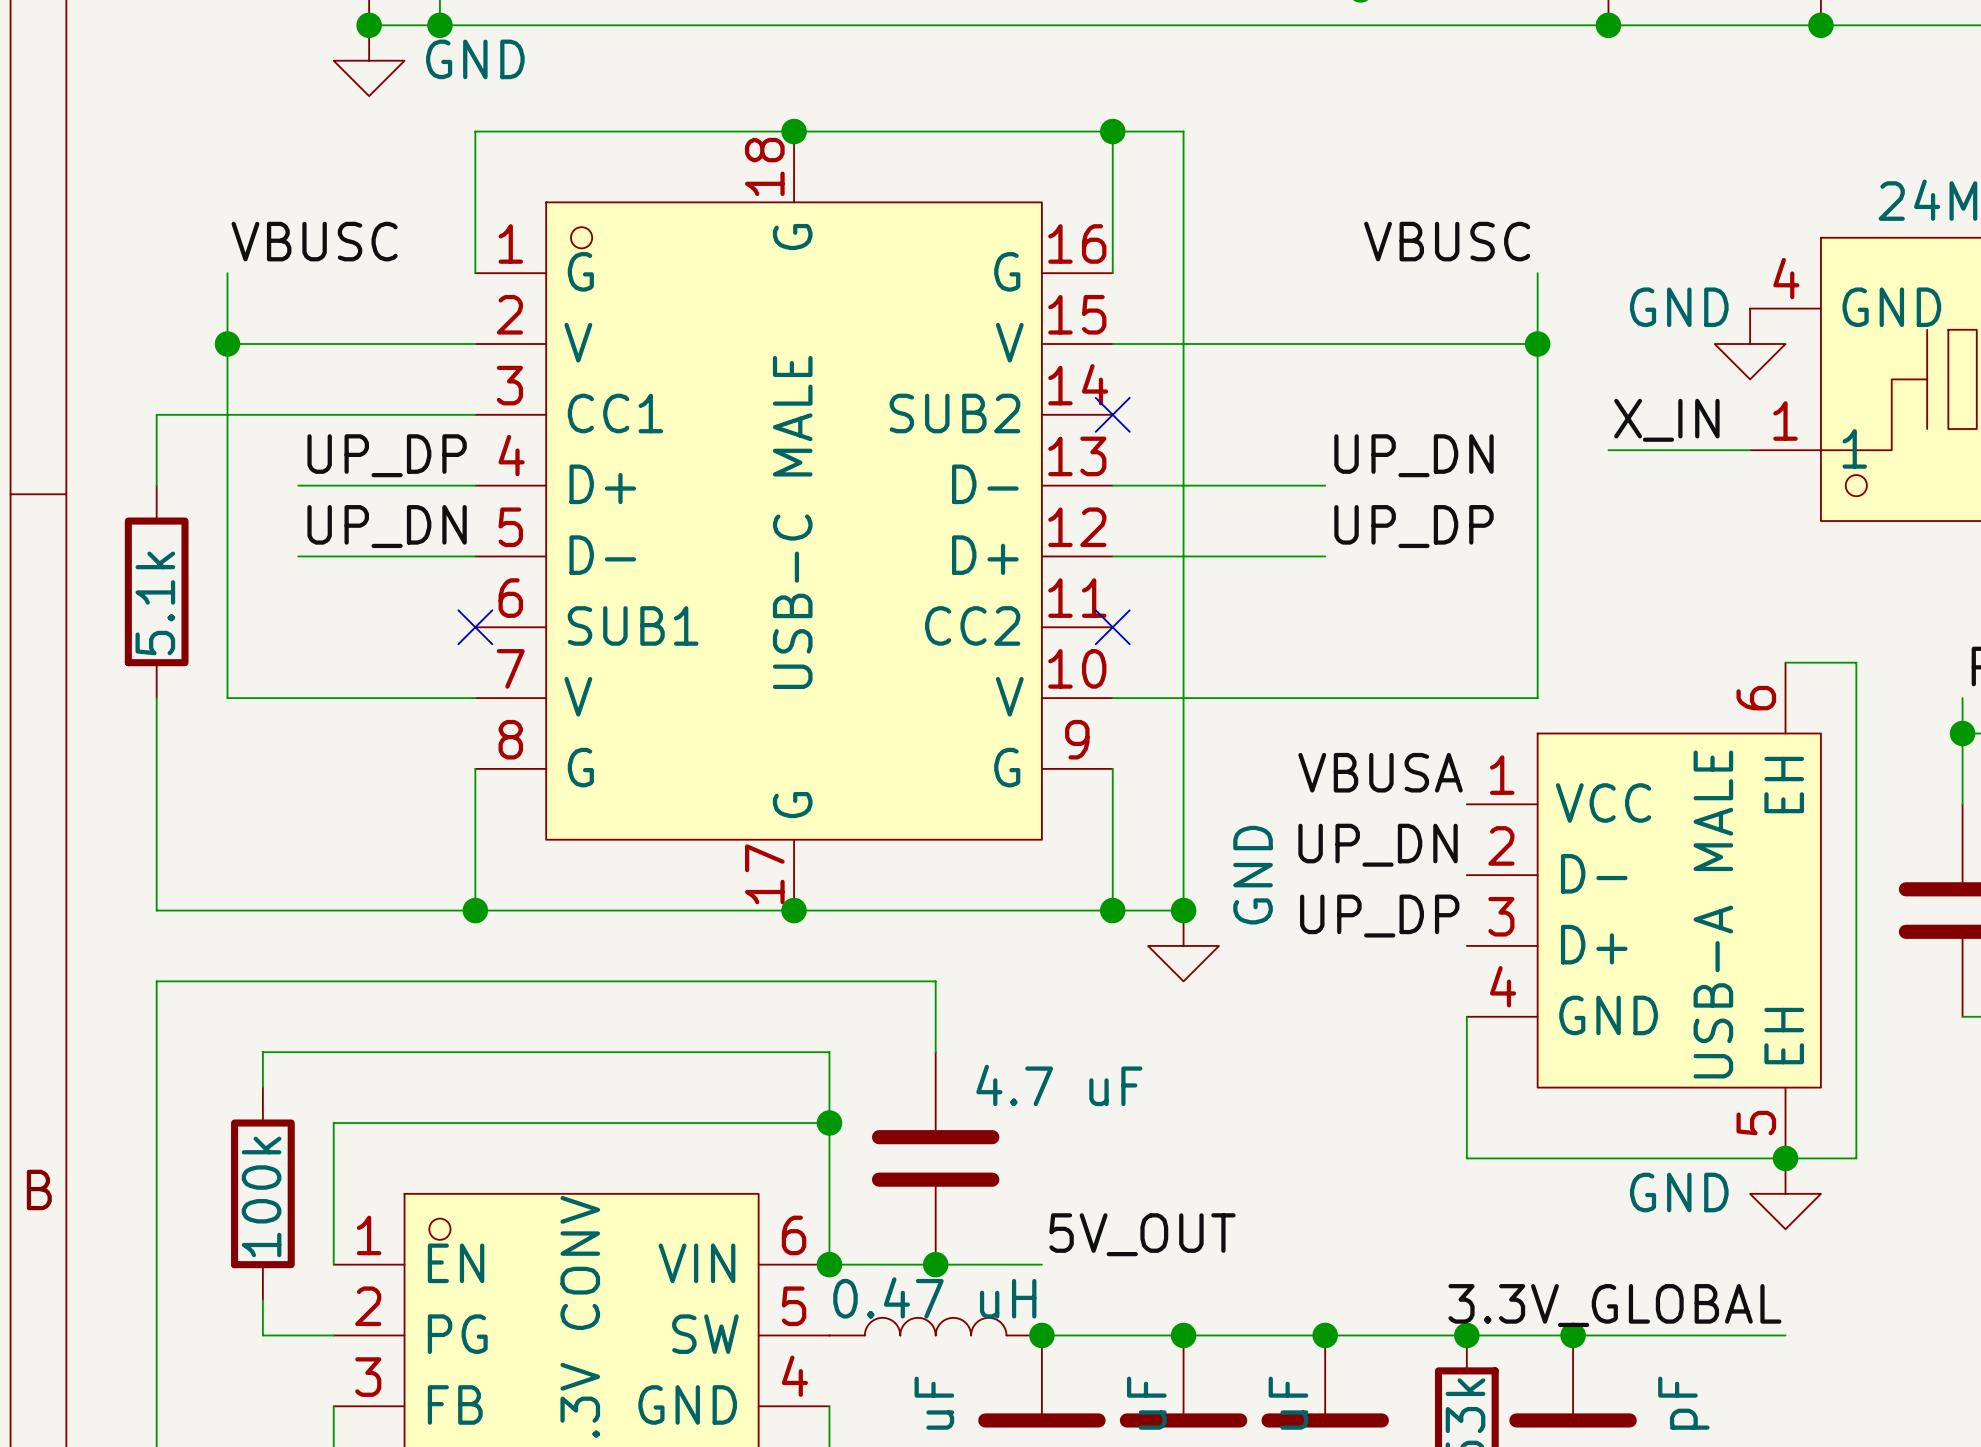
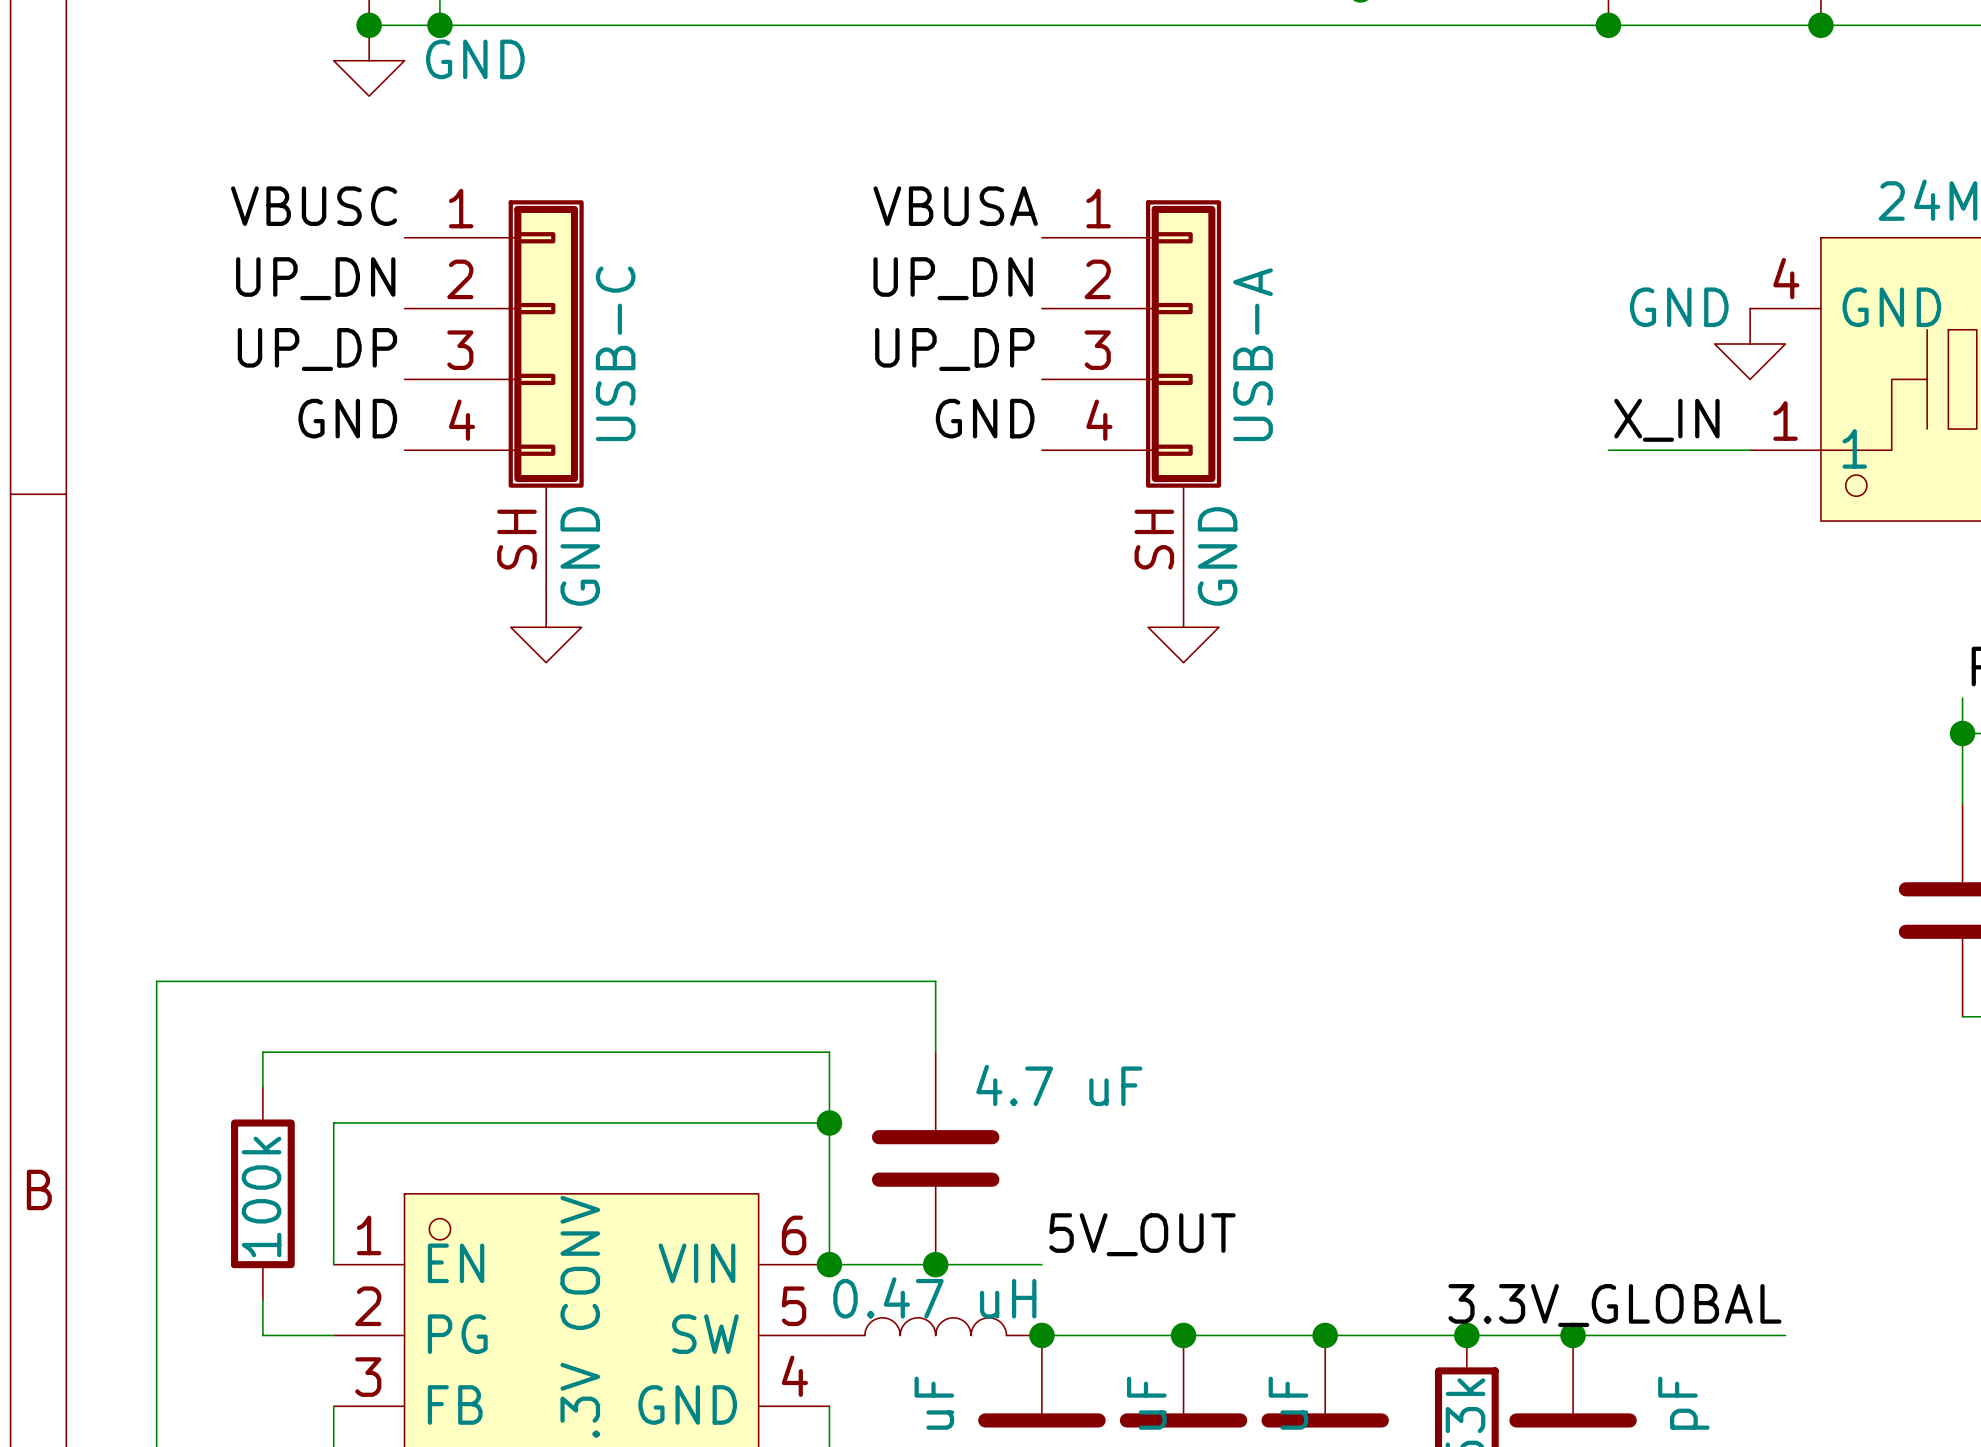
junction: (794, 131) -> none
wire: (1112, 131) (1112, 273) -> none
junction: (1112, 131) -> none
label: none -> VBUSA (955, 206)
label position: VBUSC (314, 241) -> VBUSC (314, 206)
label: VBUSC (1447, 241) -> none
wire: (227, 273) (227, 698) (475, 698) -> none
wire: (475, 273) (475, 131) (1183, 131) (1183, 910) (156, 910) (156, 698) -> none
wire: (1537, 273) (1537, 698) (1112, 698) -> none
wire: (227, 343) (475, 343) -> none
junction: (227, 343) -> none
wire: (1112, 343) (1537, 343) -> none
junction: (1537, 343) -> none
part: none -> USB-C (494, 396)
part: none -> USB-A (1131, 396)
wire: (475, 414) (156, 414) (156, 485) -> none
no-connect mark: (1112, 414) -> none
label: none -> GND (347, 418)
label: none -> GND (985, 418)
label position: UP_DP (387, 455) -> UP_DP (317, 349)
label position: UP_DN (1413, 455) -> UP_DN (953, 278)
wire: (298, 485) (475, 485) -> none
wire: (1112, 485) (1325, 485) -> none
part: USB-C MALE (794, 521) -> none
label position: UP_DN (387, 526) -> UP_DN (315, 278)
label position: UP_DP (1413, 526) -> UP_DP (954, 349)
wire: (298, 556) (475, 556) -> none
wire: (1112, 556) (1325, 556) -> none
part: 5.1k (156, 591) -> none
no-connect mark: (475, 627) -> none
power symbol: none -> GND (546, 627)
no-connect mark: (1112, 627) -> none
wire: (1785, 662) (1856, 662) (1856, 1158) (1466, 1158) (1466, 1016) -> none
wire: (475, 768) (475, 910) -> none
wire: (1112, 768) (1112, 910) -> none
label: VBUSA (1380, 772) -> none
label: UP_DN (1378, 845) -> none
power symbol text position: GND (1253, 875) -> GND (1217, 556)
junction: (475, 910) -> none
junction: (794, 910) -> none
junction: (1112, 910) -> none
junction: (1183, 910) -> none
part: USB-A MALE (1643, 910) -> none
label: UP_DP (1379, 916) -> none
power symbol position: GND (1183, 945) -> GND (1183, 627)
junction: (1785, 1158) -> none
power symbol: GND (1785, 1193) -> none

